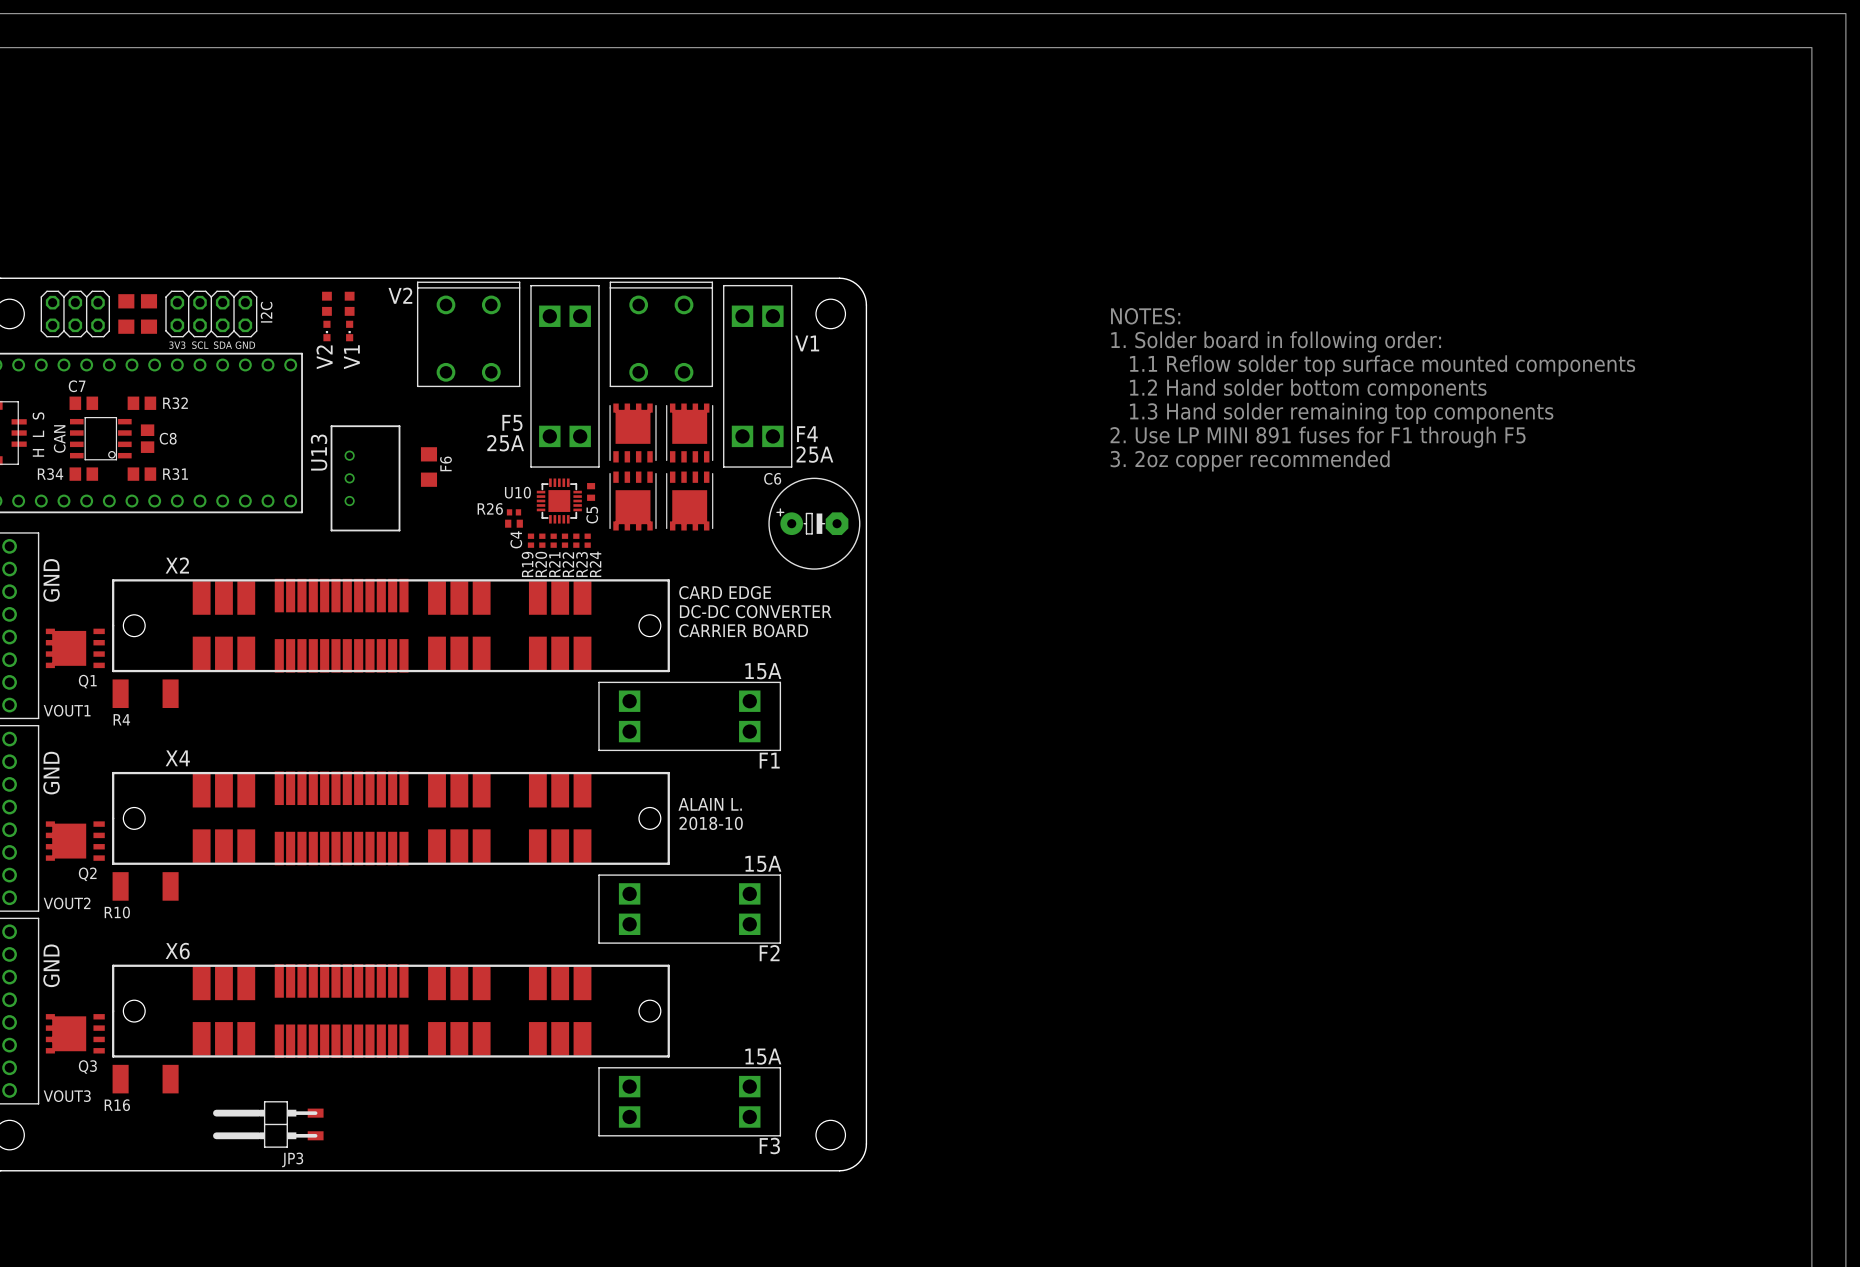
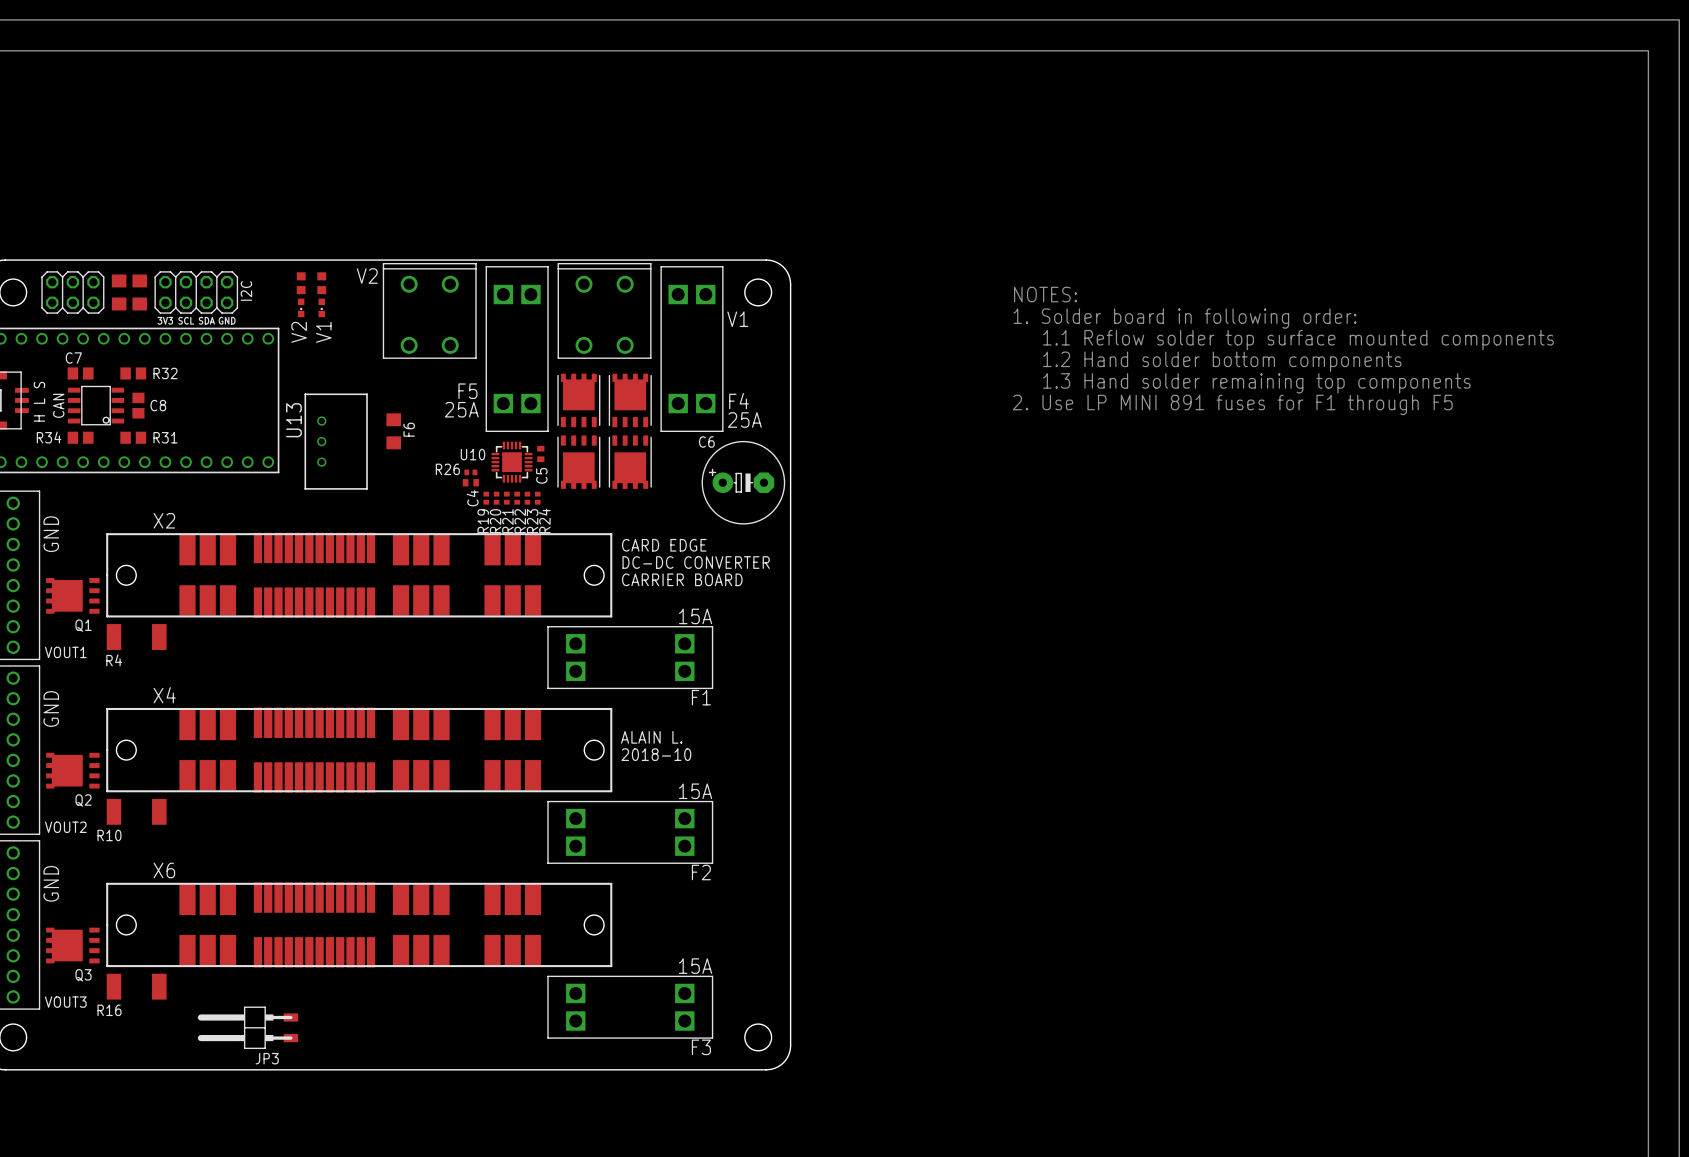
text: 3. 2oz copper recommended (1250, 461) -> none

